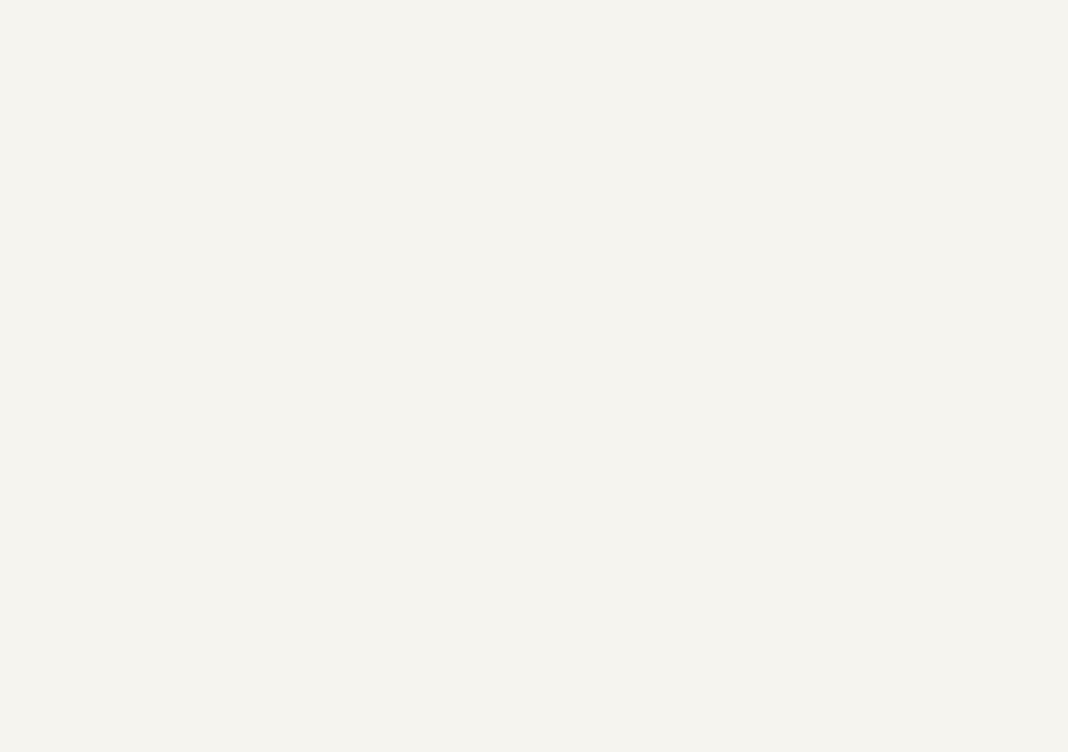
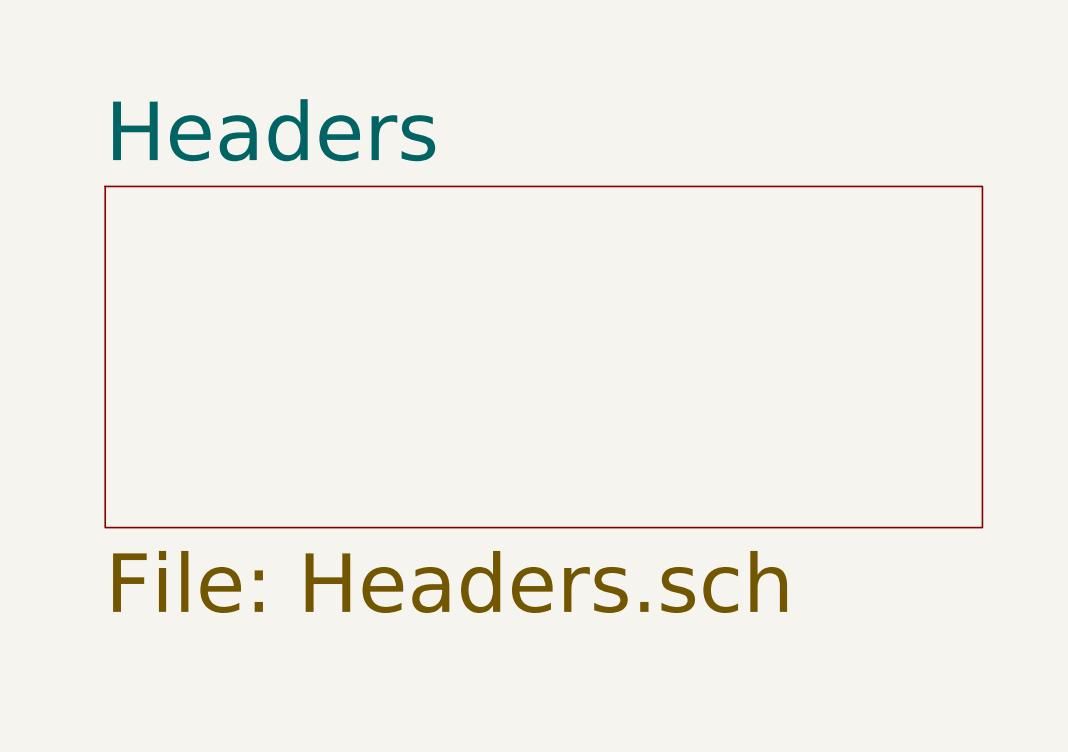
sheet Headers: none -> File: Headers.sch (543, 357)

